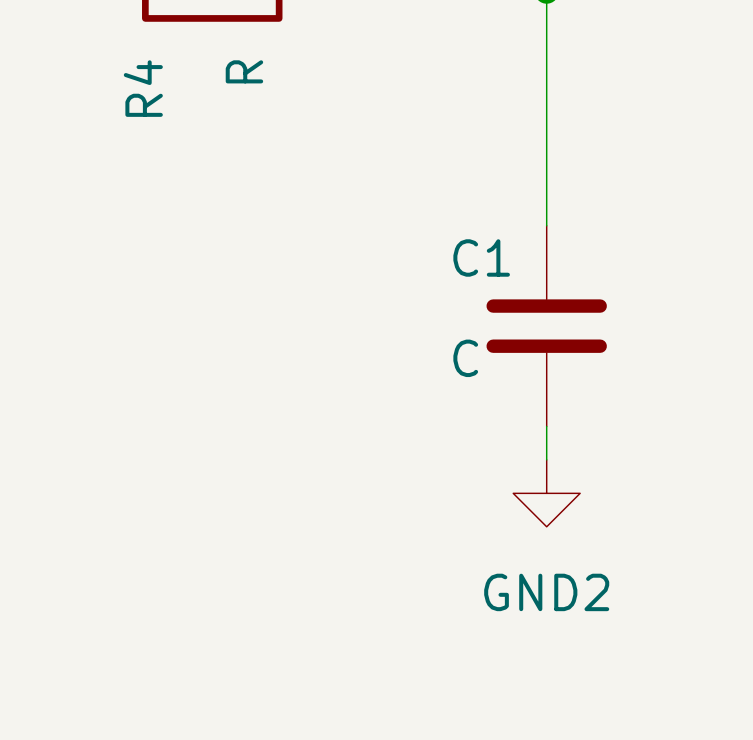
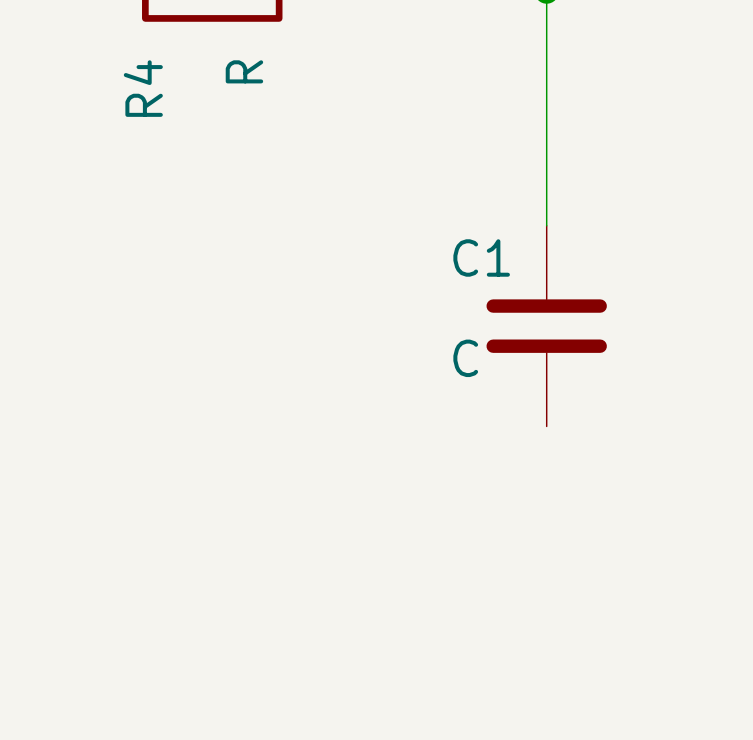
wire: (546, 426) (546, 459) -> none
power symbol: GND2 (546, 493) -> none

